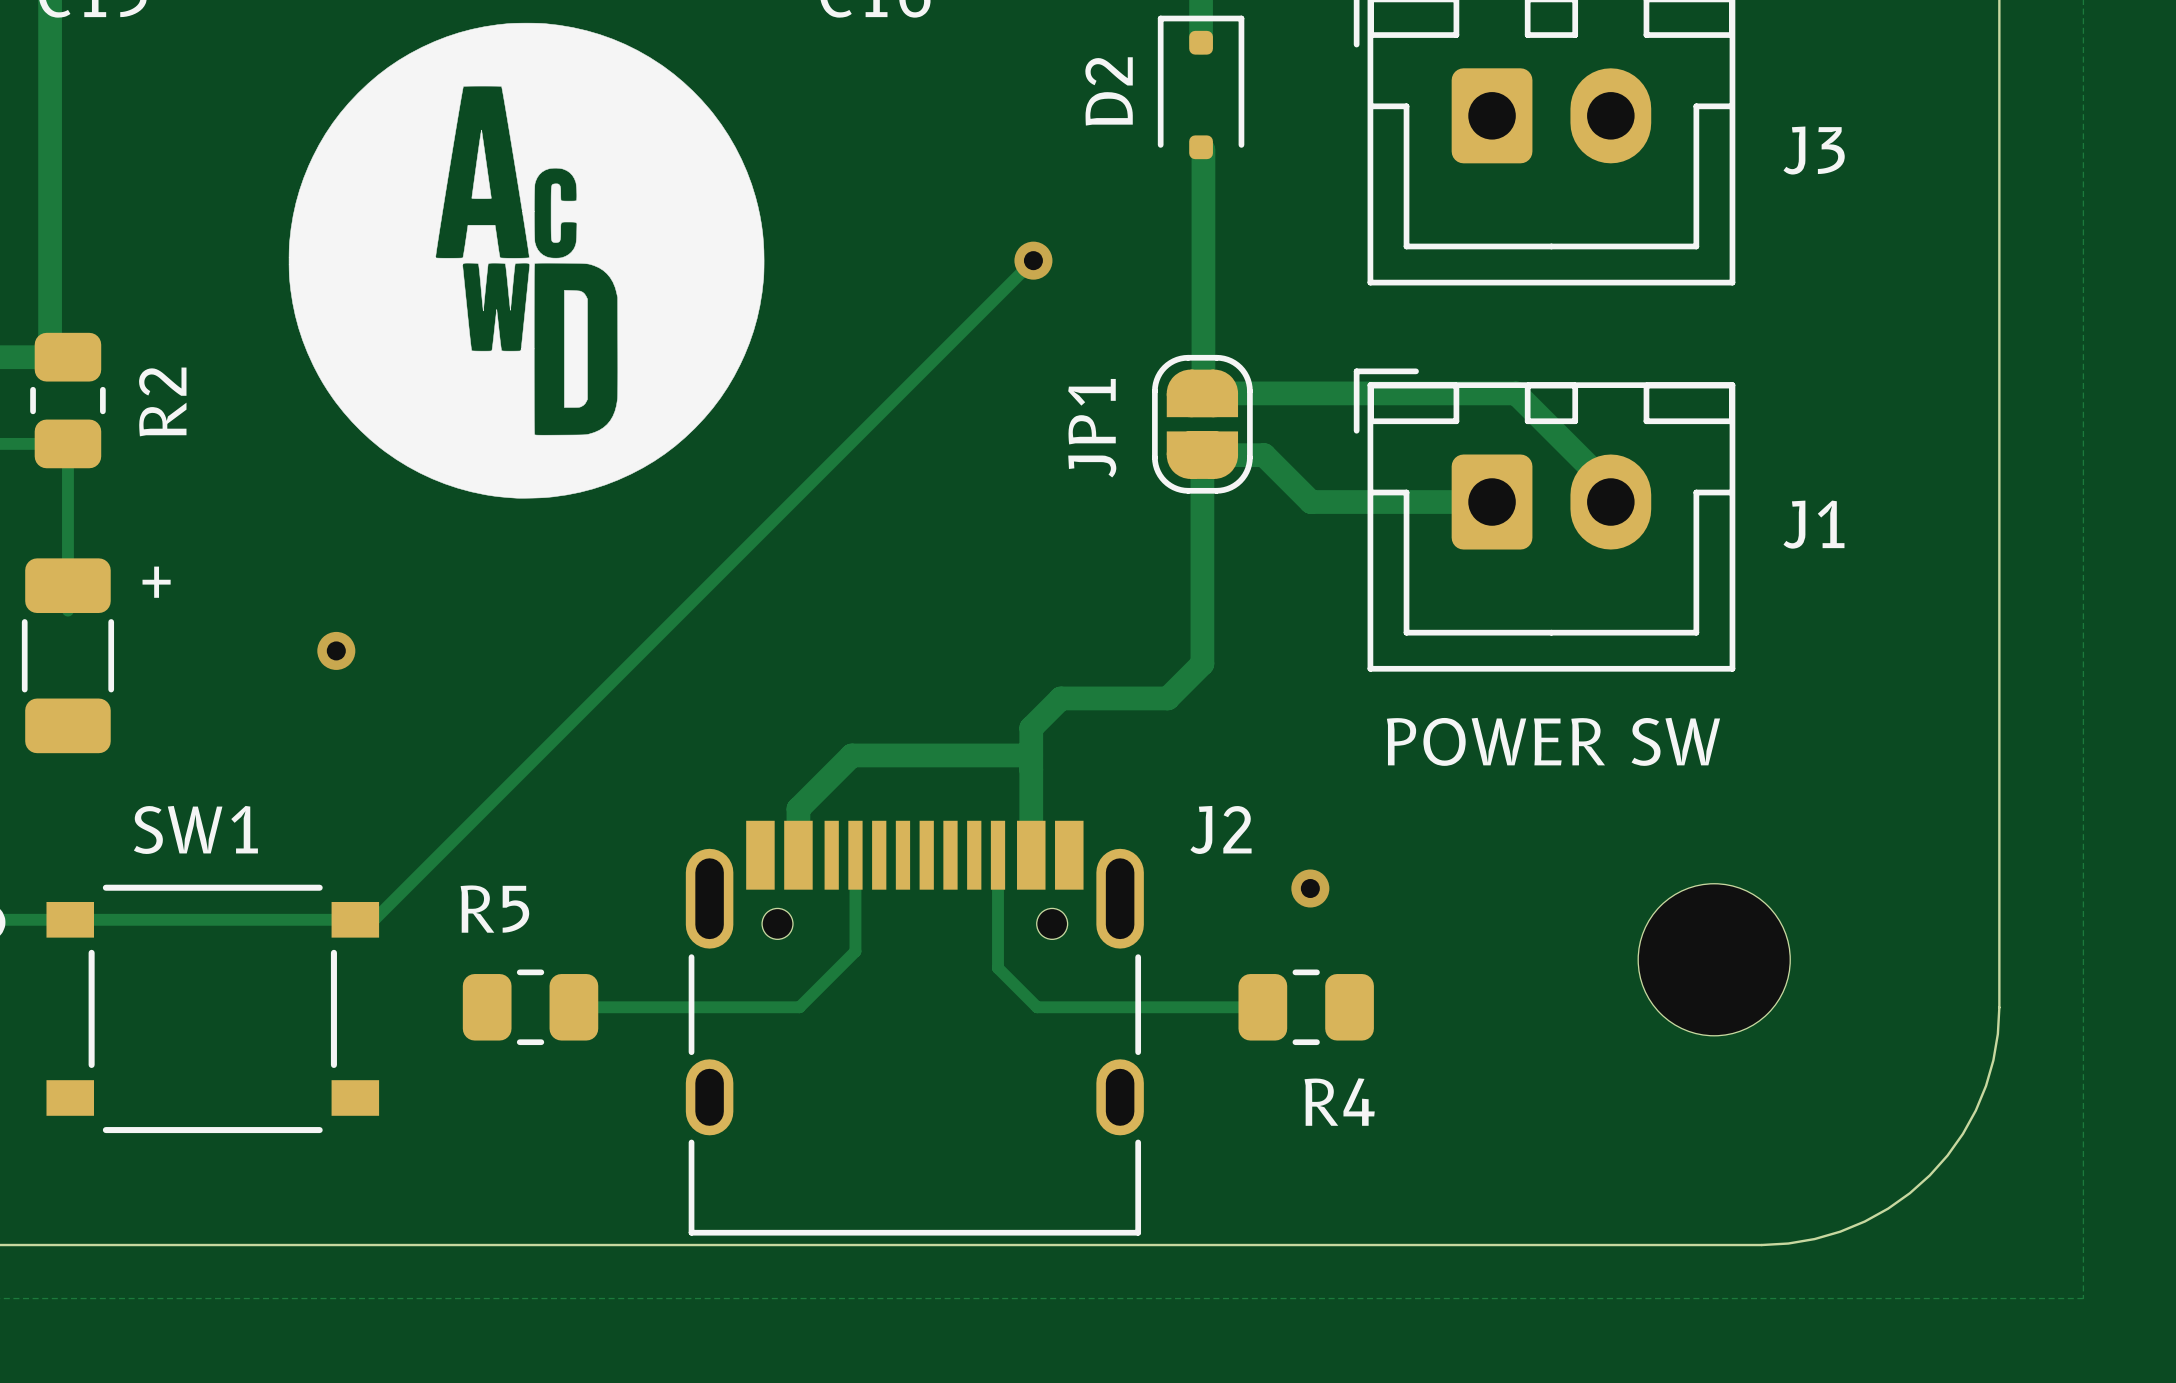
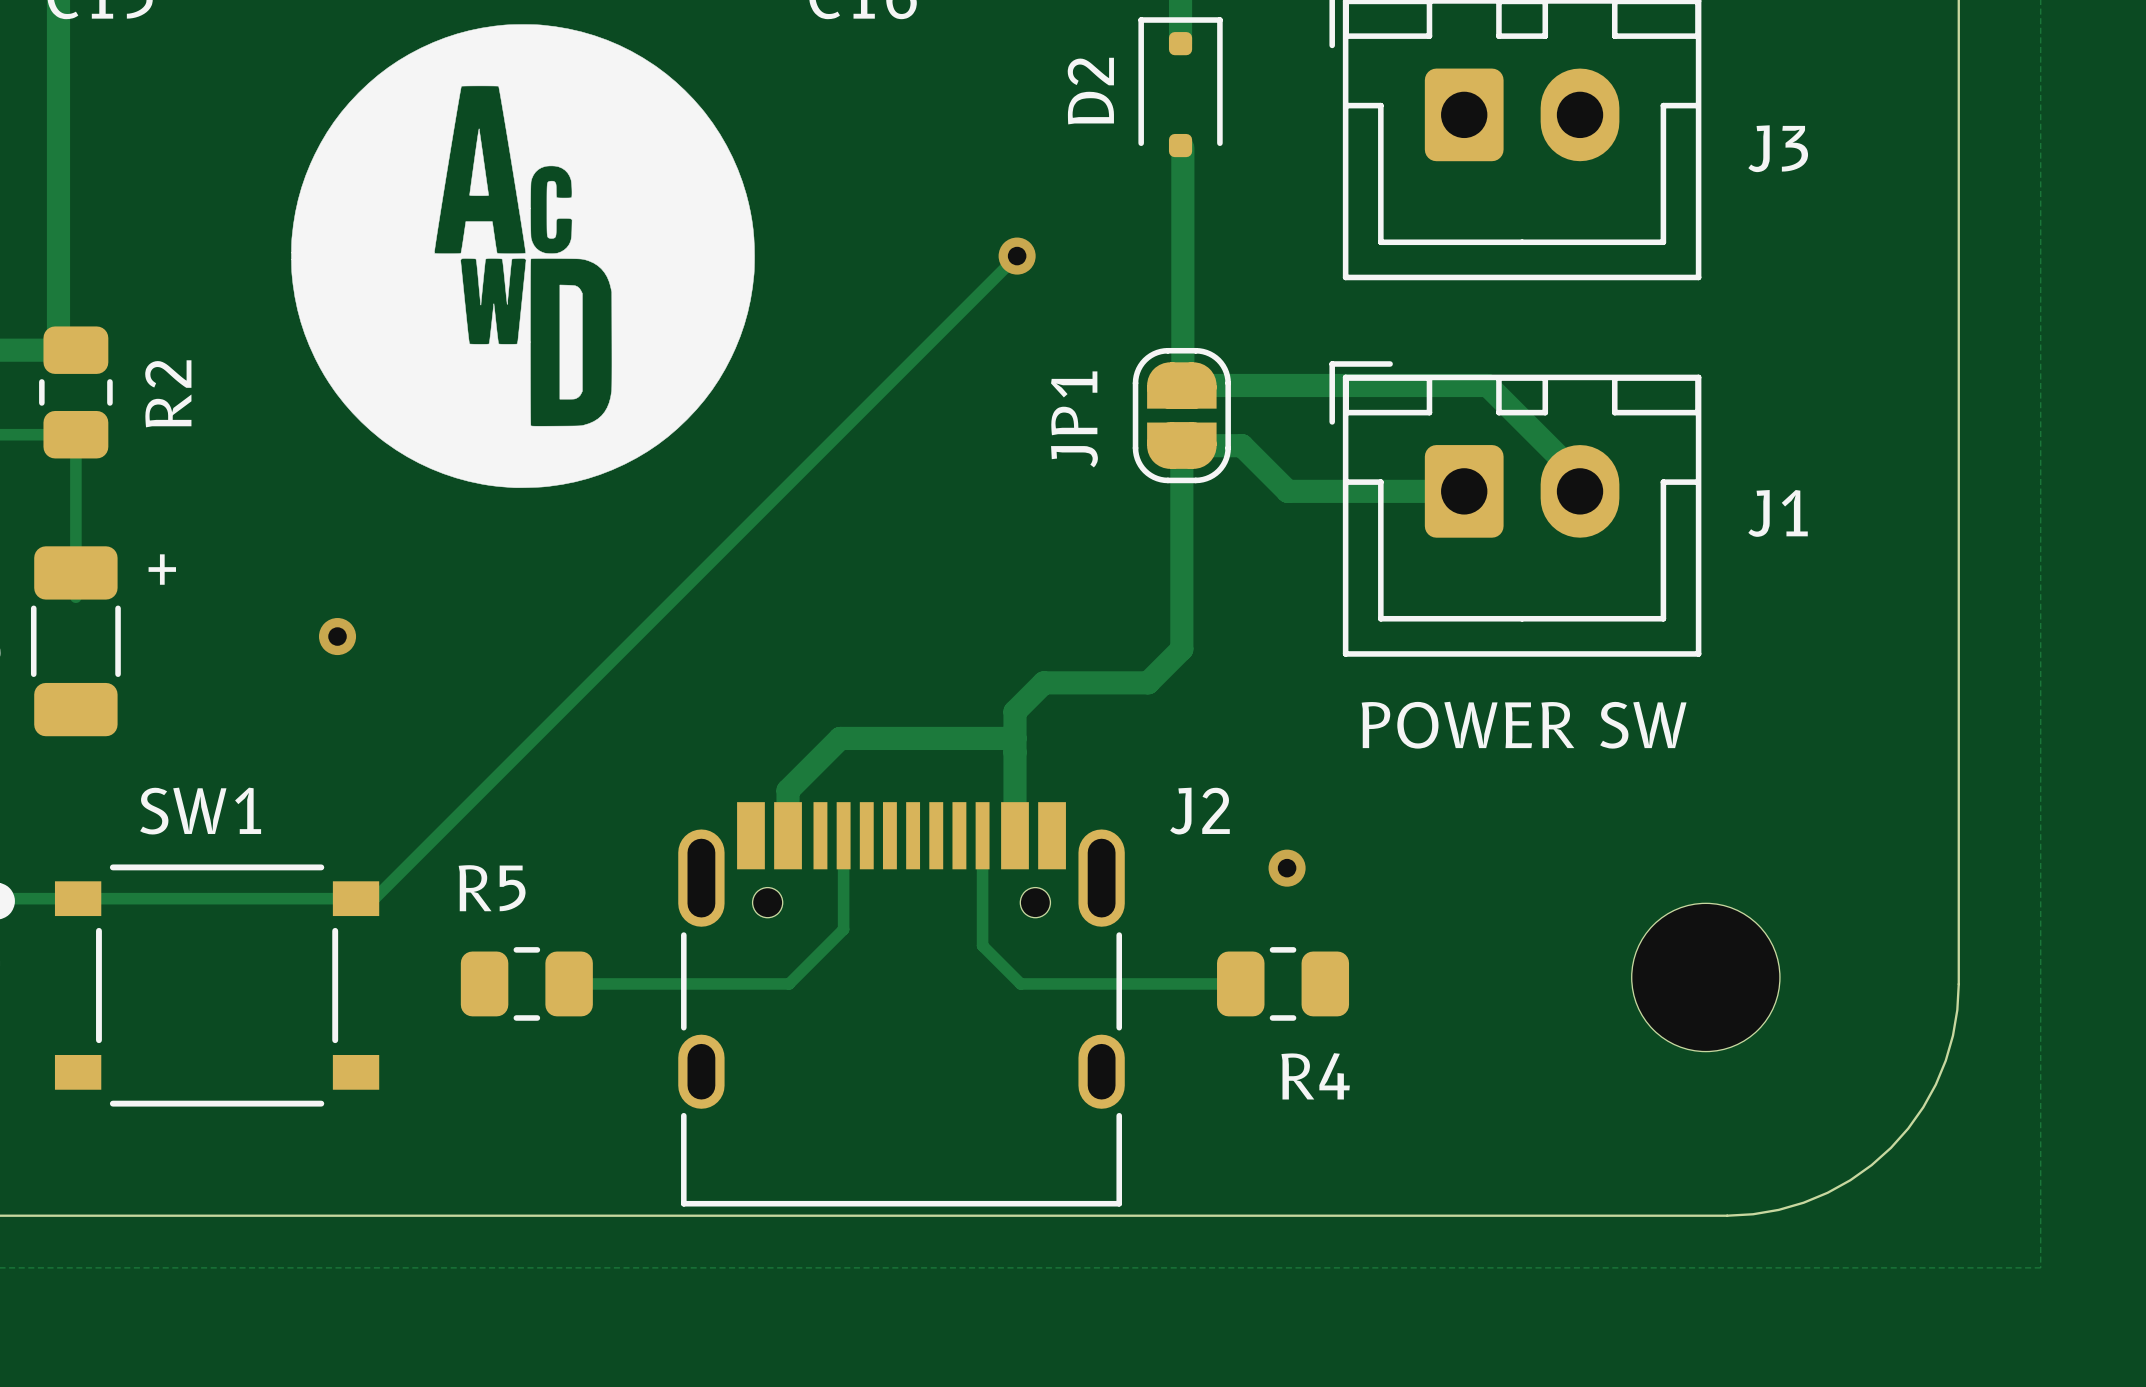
part position: (1714, 959) -> (1705, 977)

